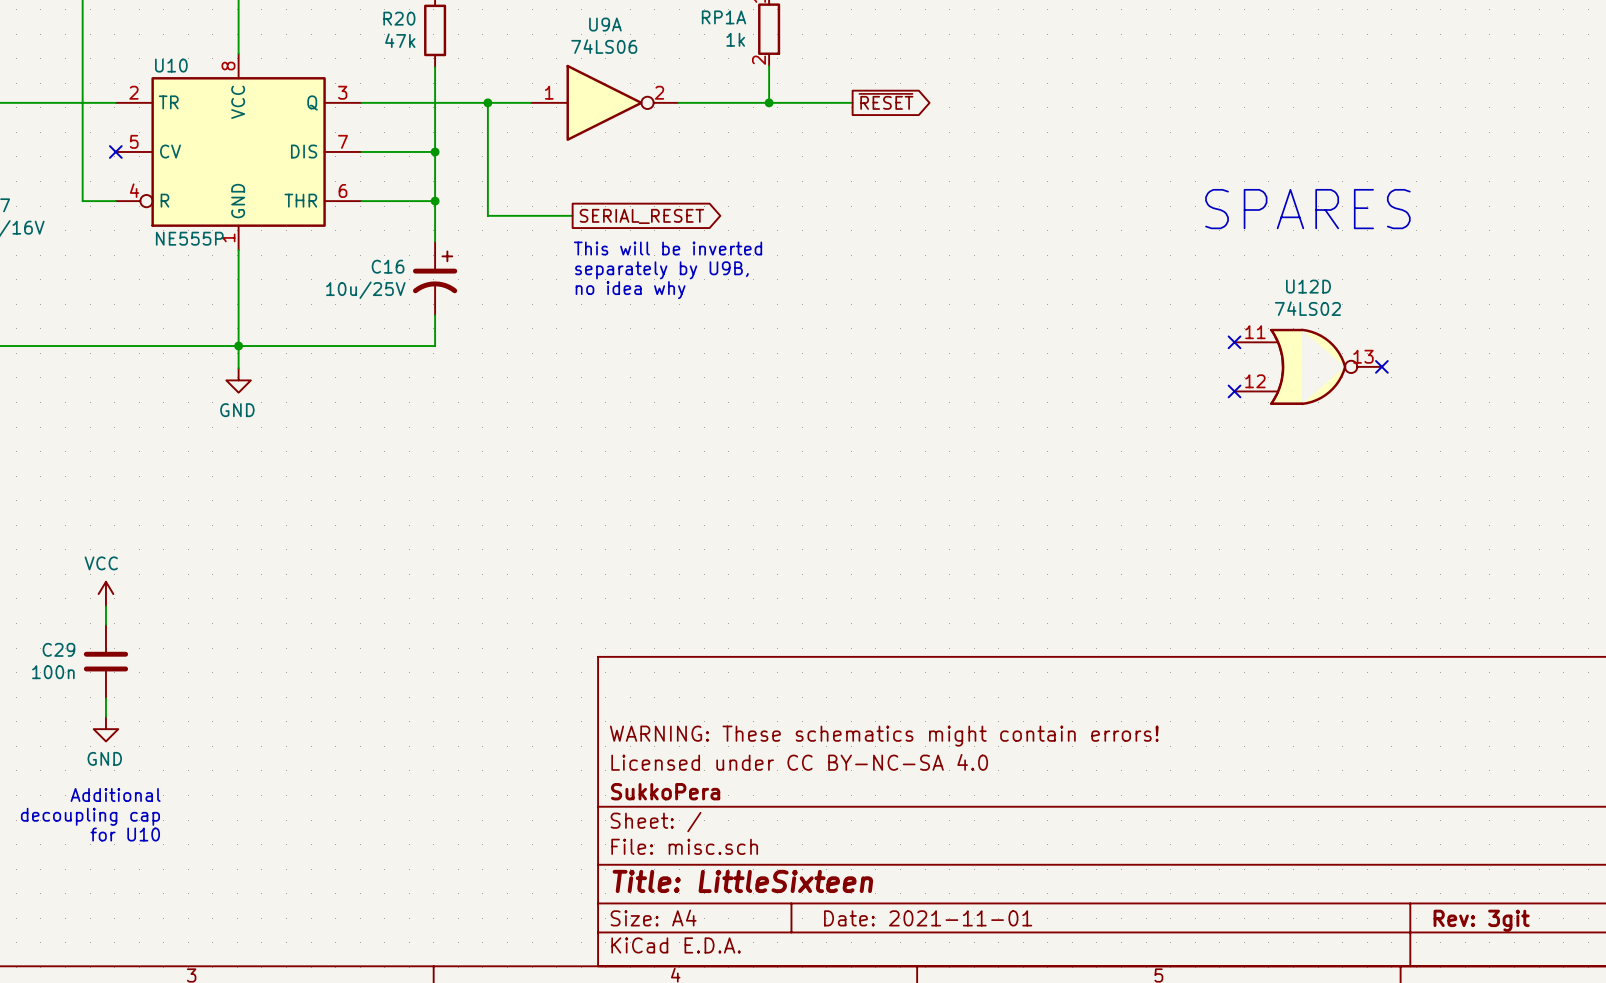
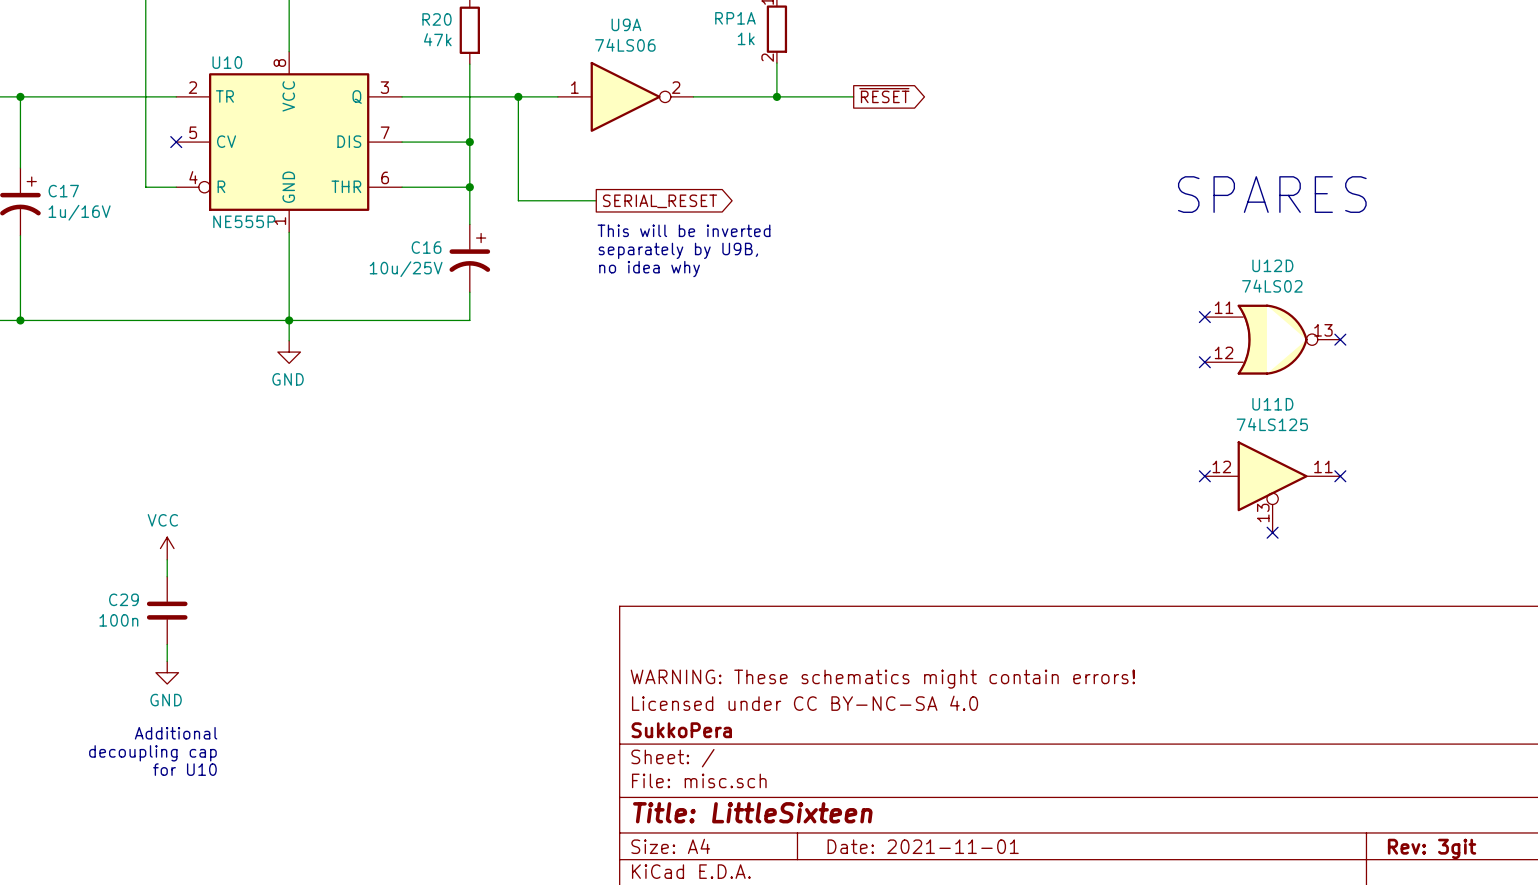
no-connect mark: none -> (1204, 476)
no-connect mark: none -> (1340, 476)
U11D: none -> 74LS125 (1272, 486)
no-connect mark: none -> (1272, 532)

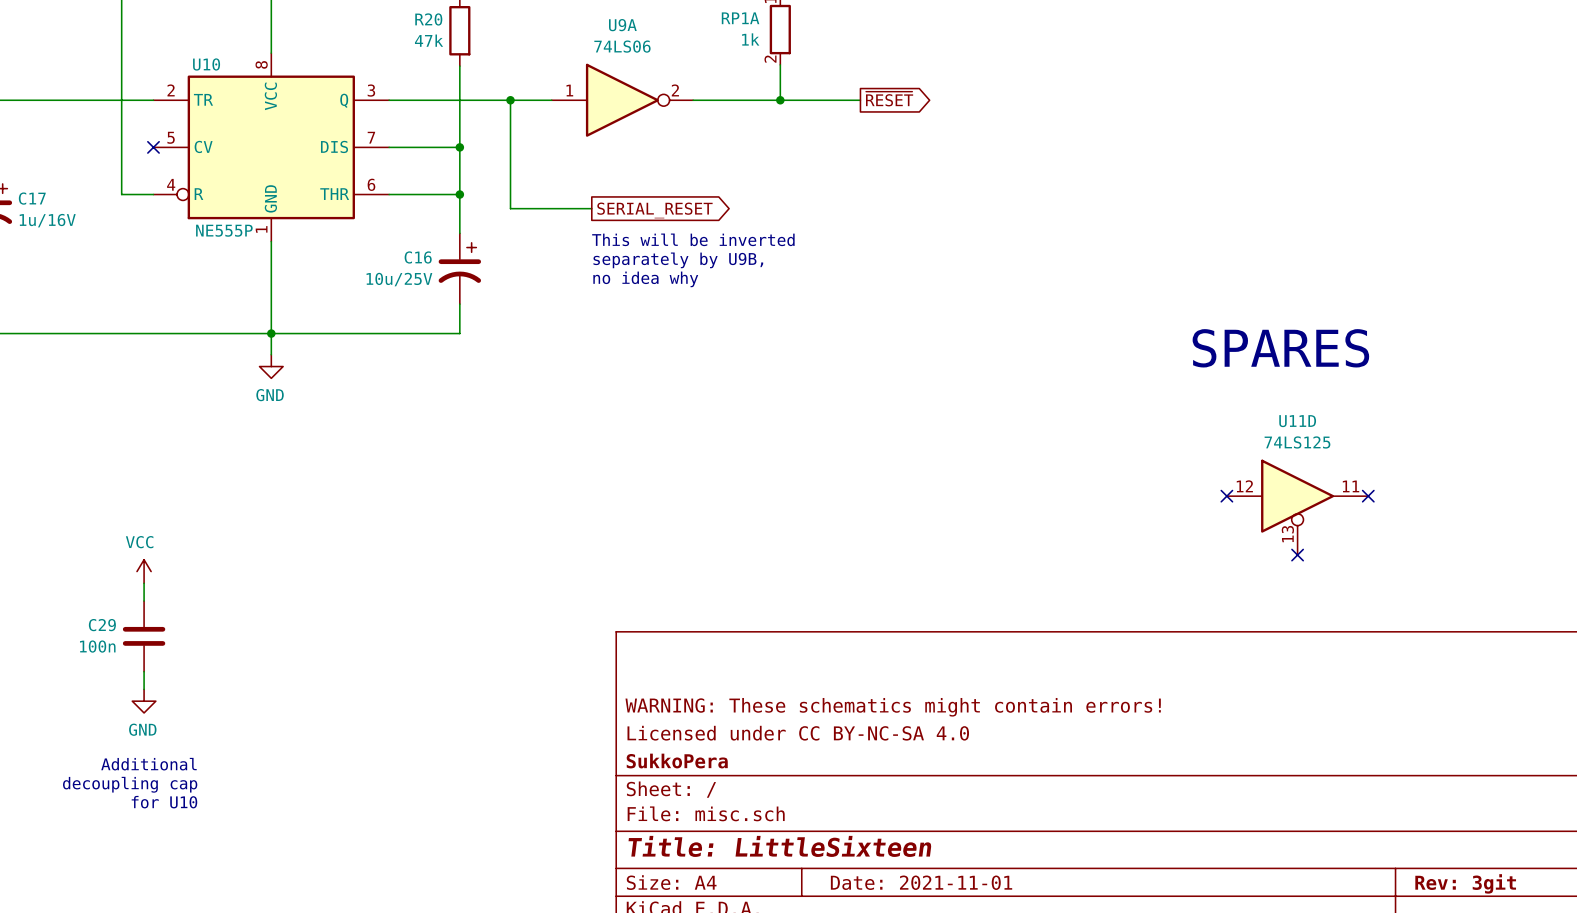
text position: SPARES (1272, 194) -> SPARES (1280, 348)
no-connect mark: (1204, 317) -> none
U12D: 74LS02 (1272, 339) -> none
no-connect mark: (1340, 339) -> none
no-connect mark: (1204, 362) -> none

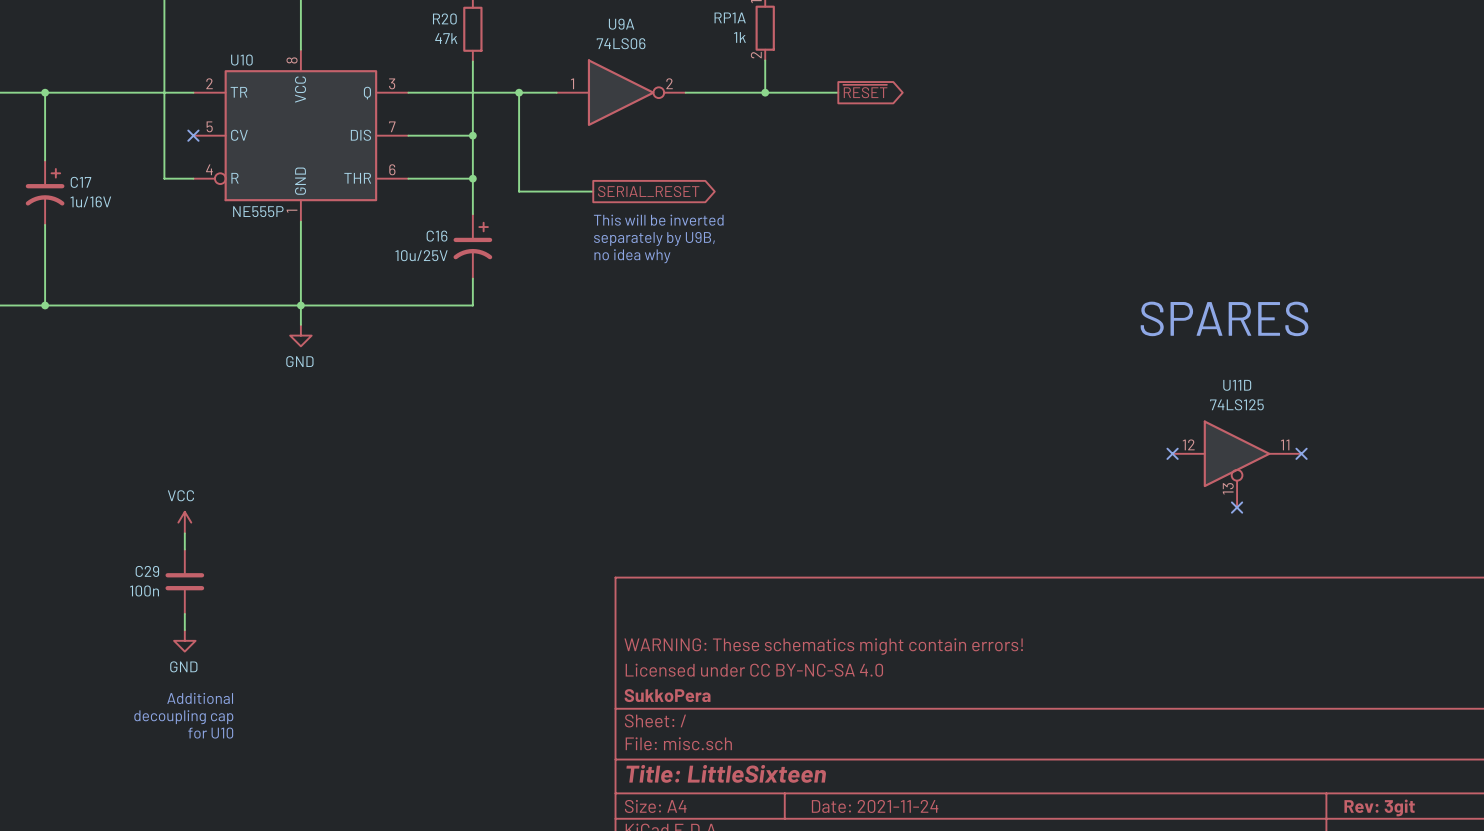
title block: Date: 2021-11-01 (921, 882) -> Date: 2021-11-24 (875, 806)

